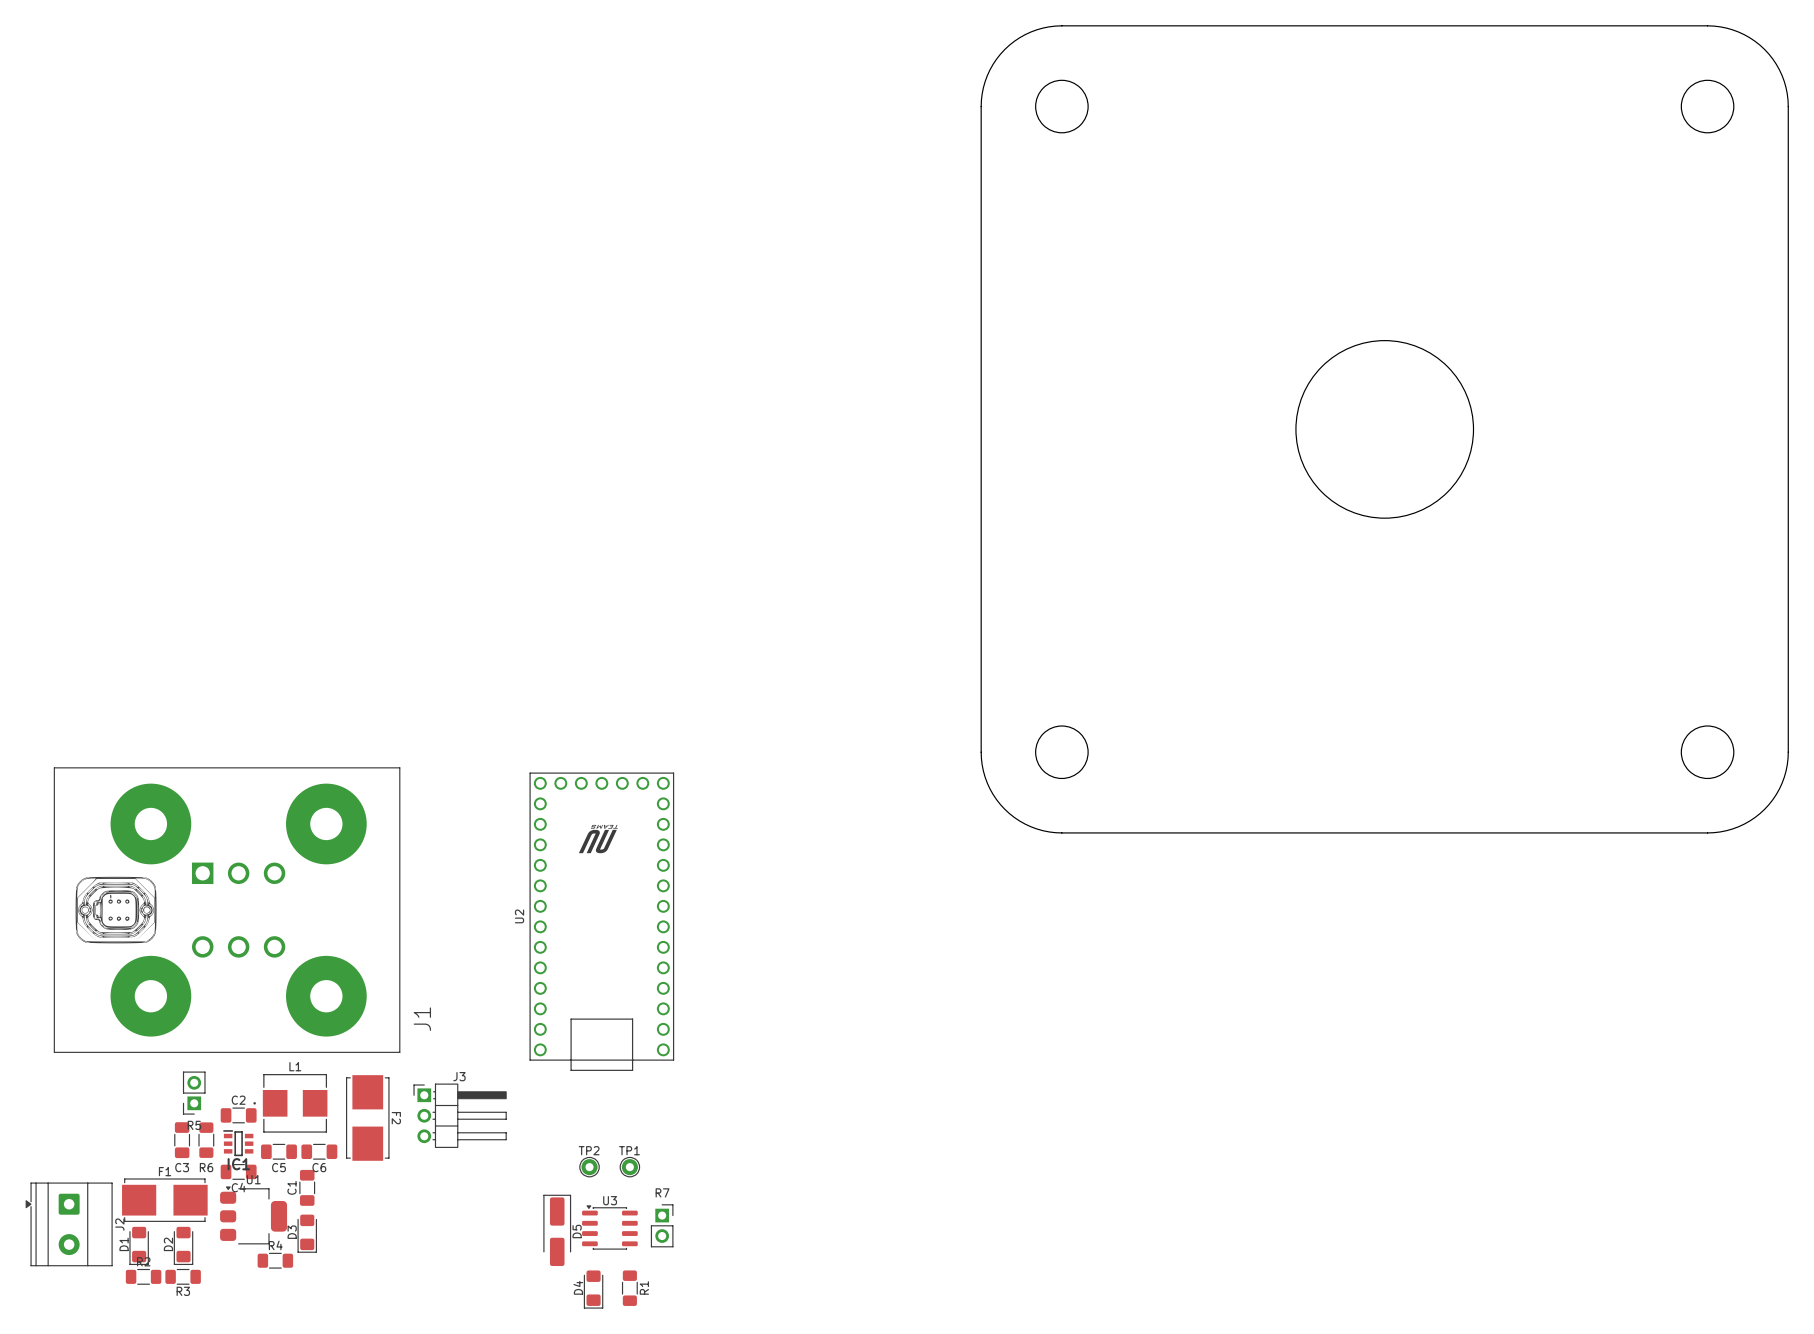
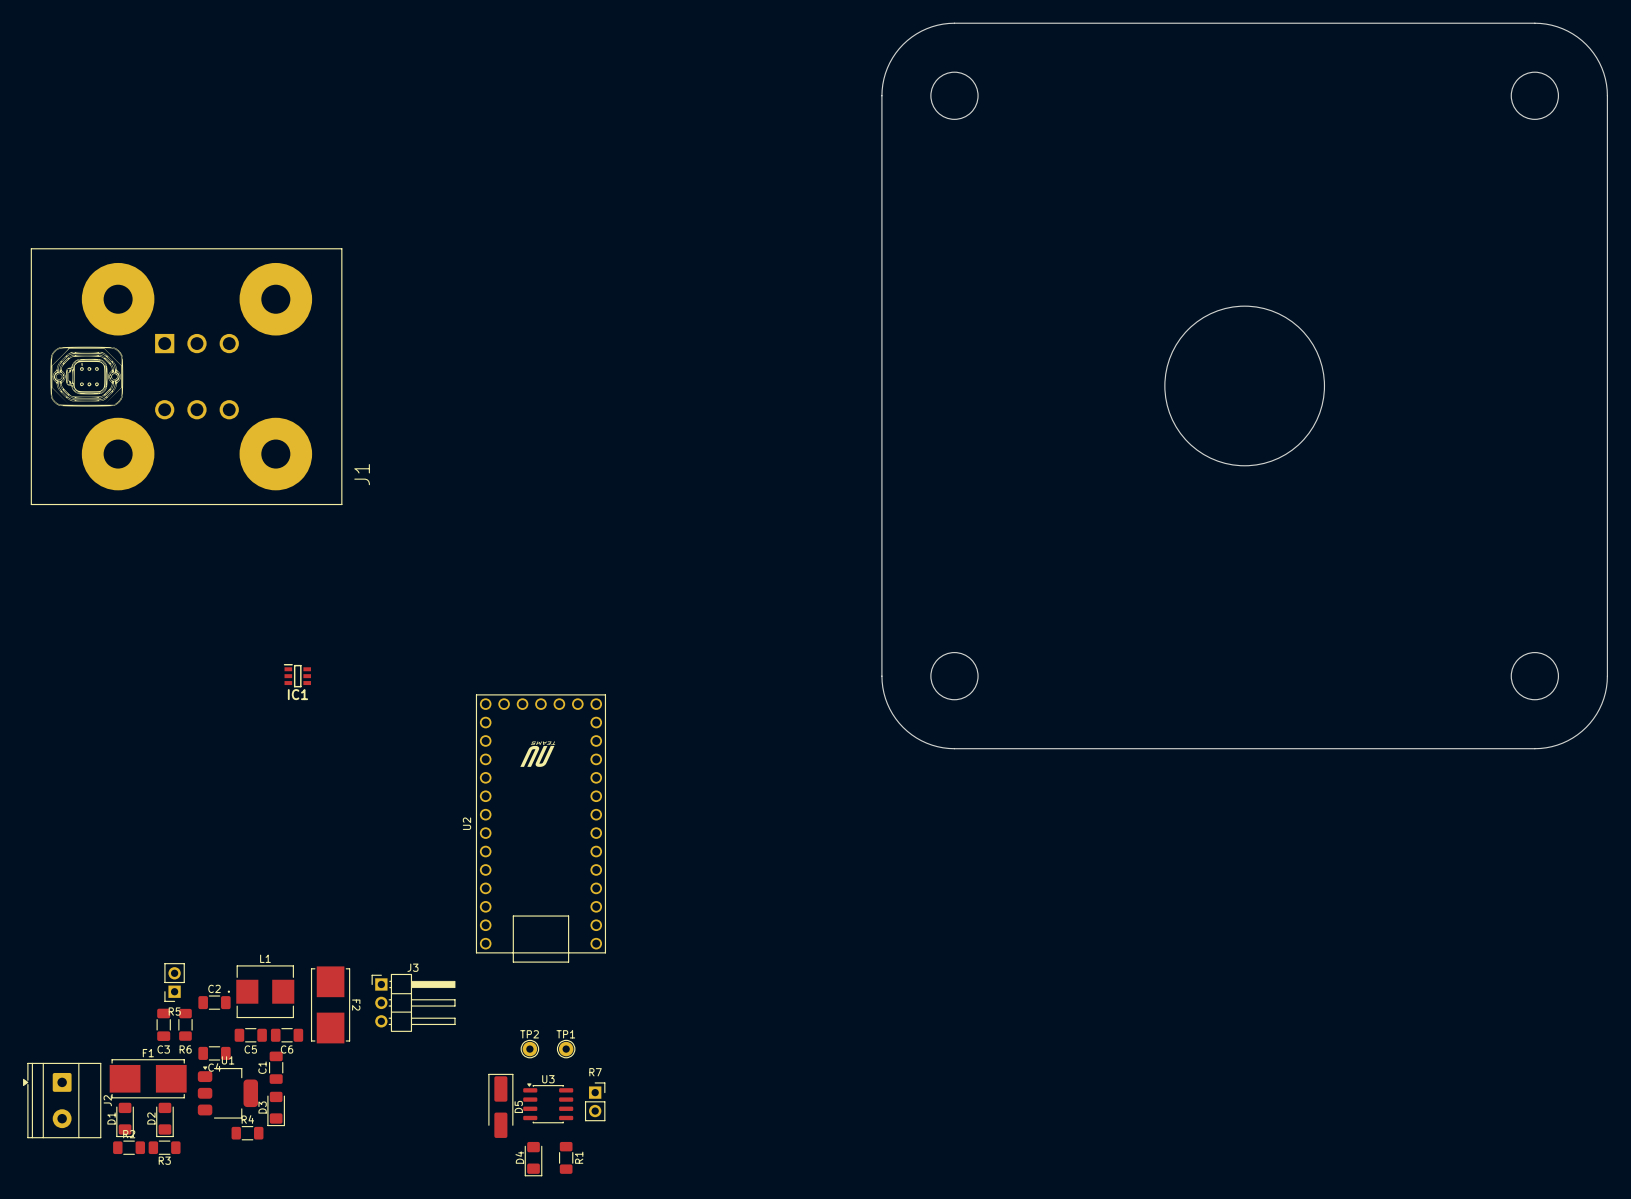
J1 position: (227, 910) -> (186, 376)
IC1 position: (238, 1143) -> (297, 675)

